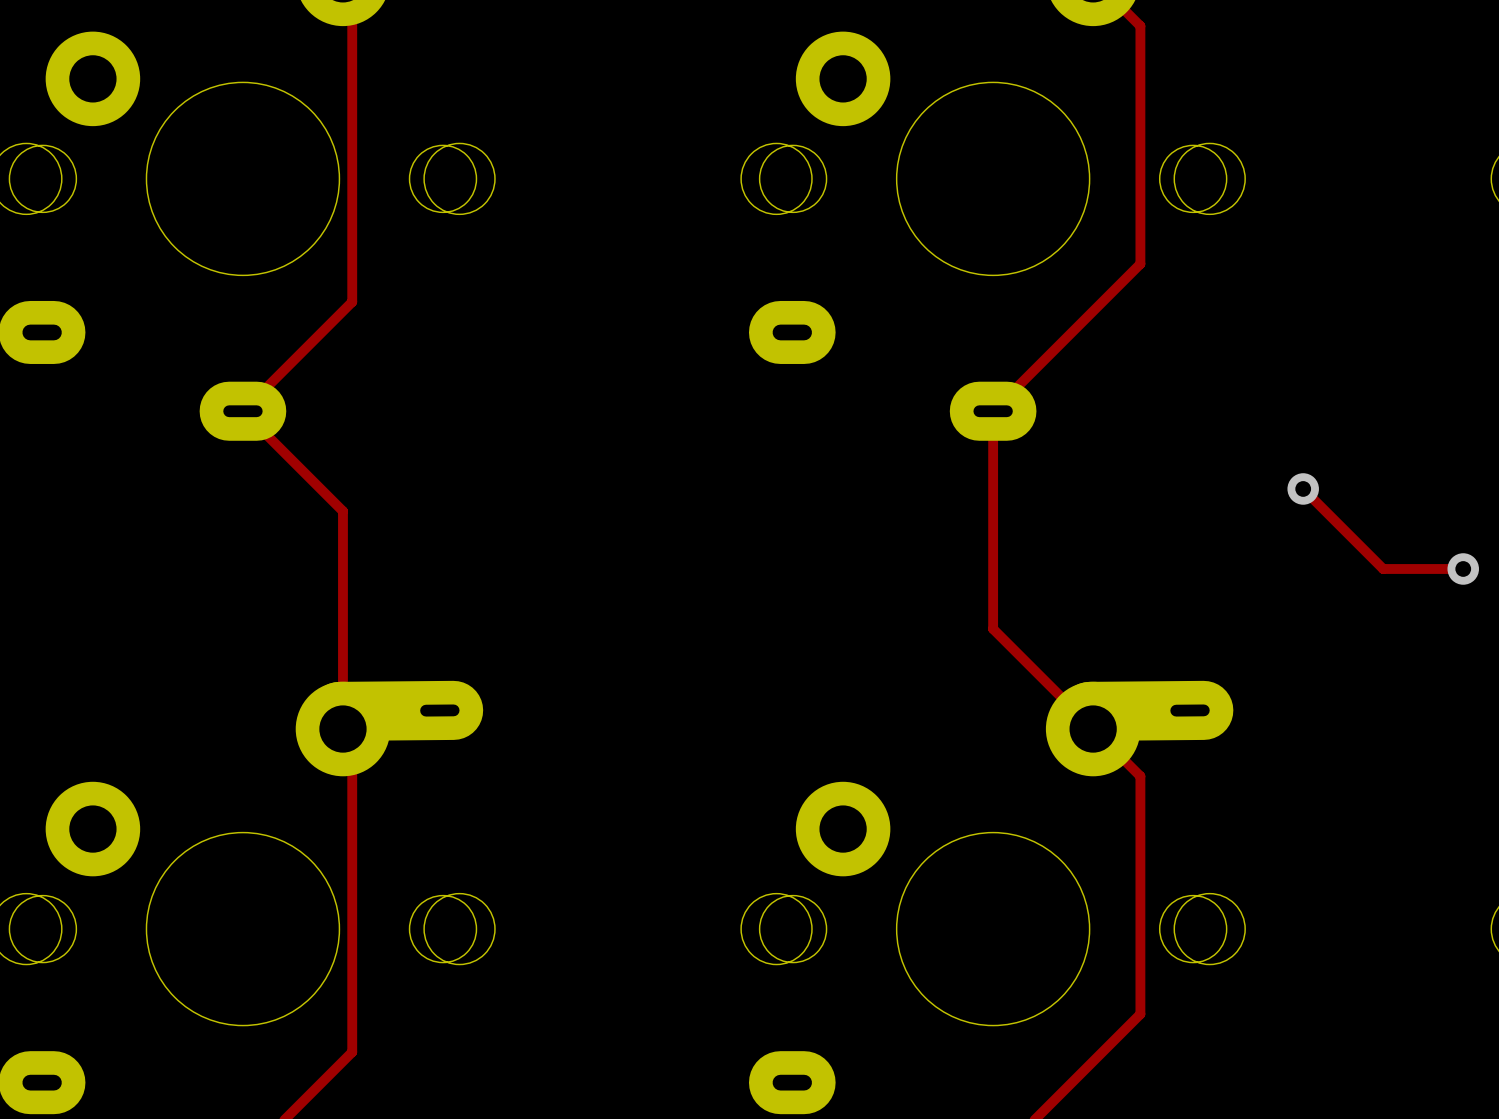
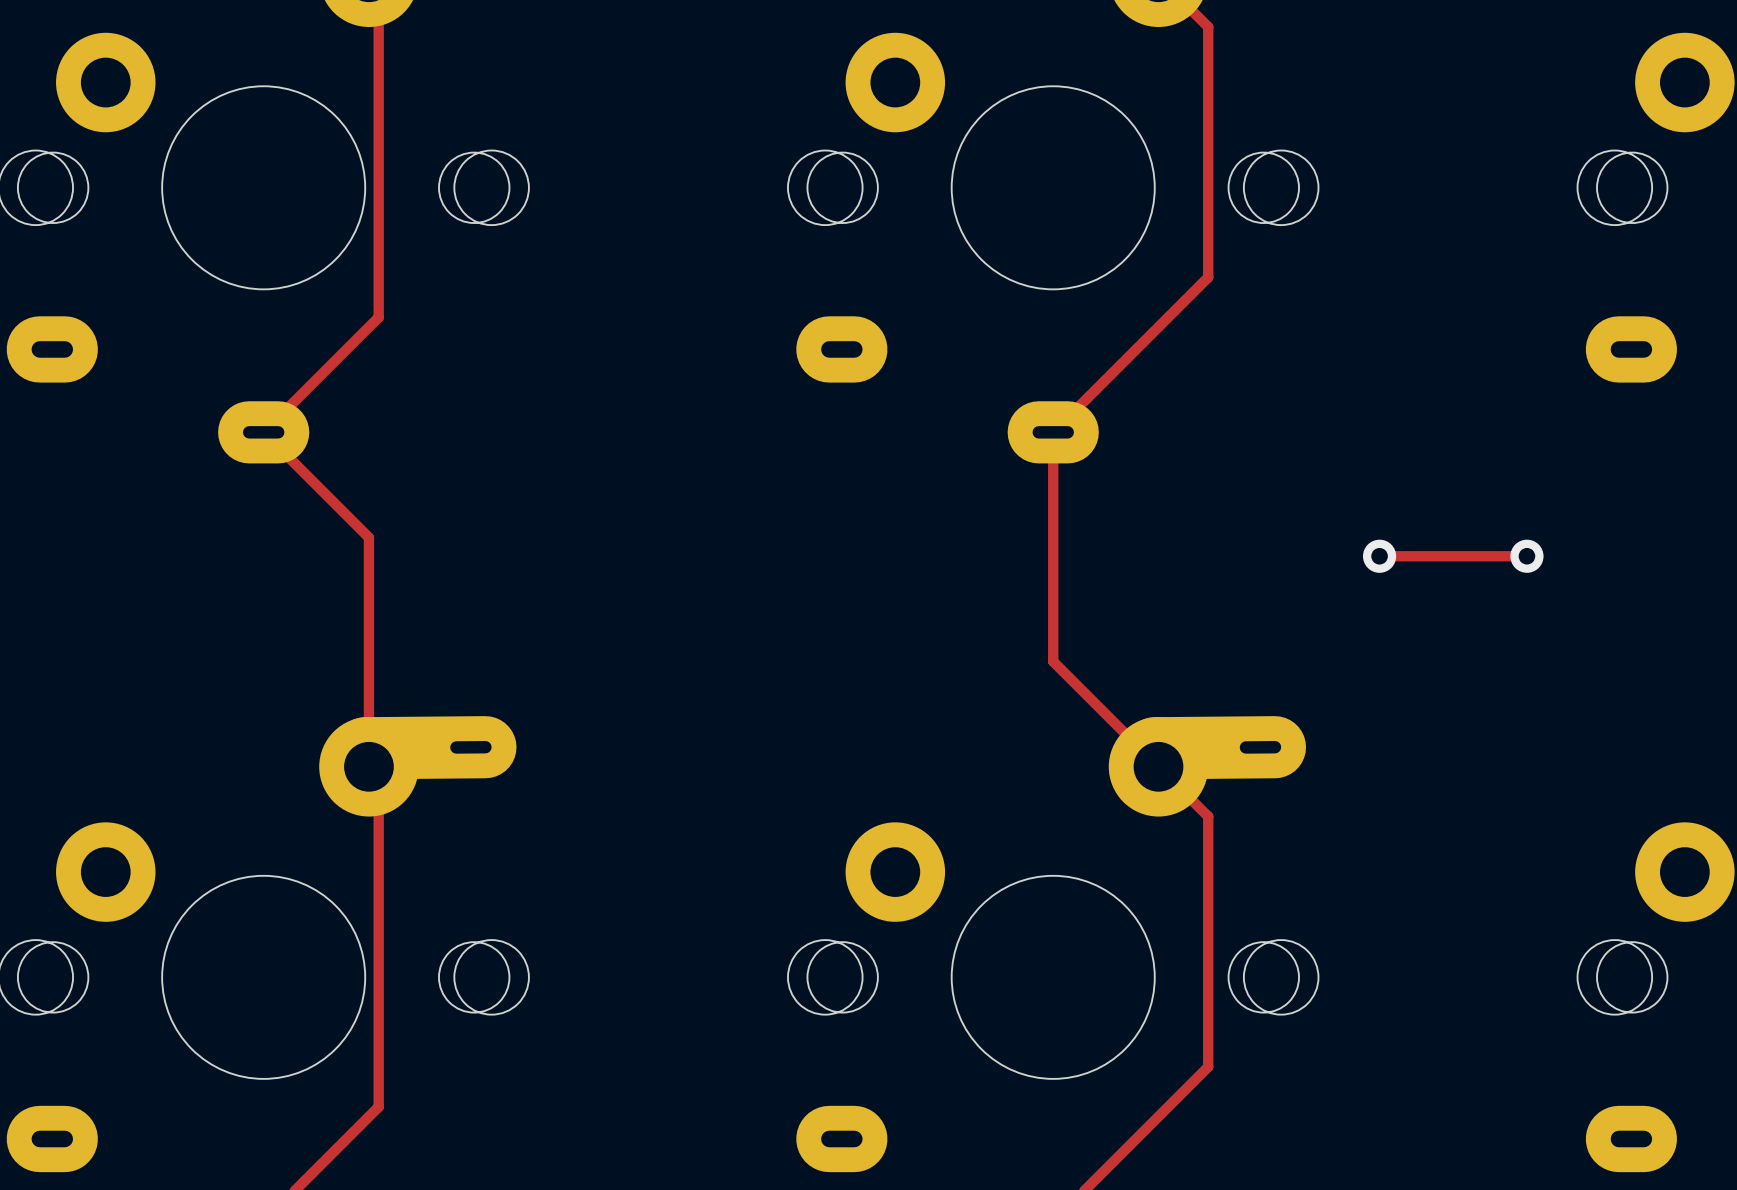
track: (1303, 488) (1383, 568) (1463, 568) -> none
via position: (1303, 488) -> (1379, 556)
track: none -> (1379, 556) (1526, 556)
via position: (1463, 568) -> (1526, 556)

